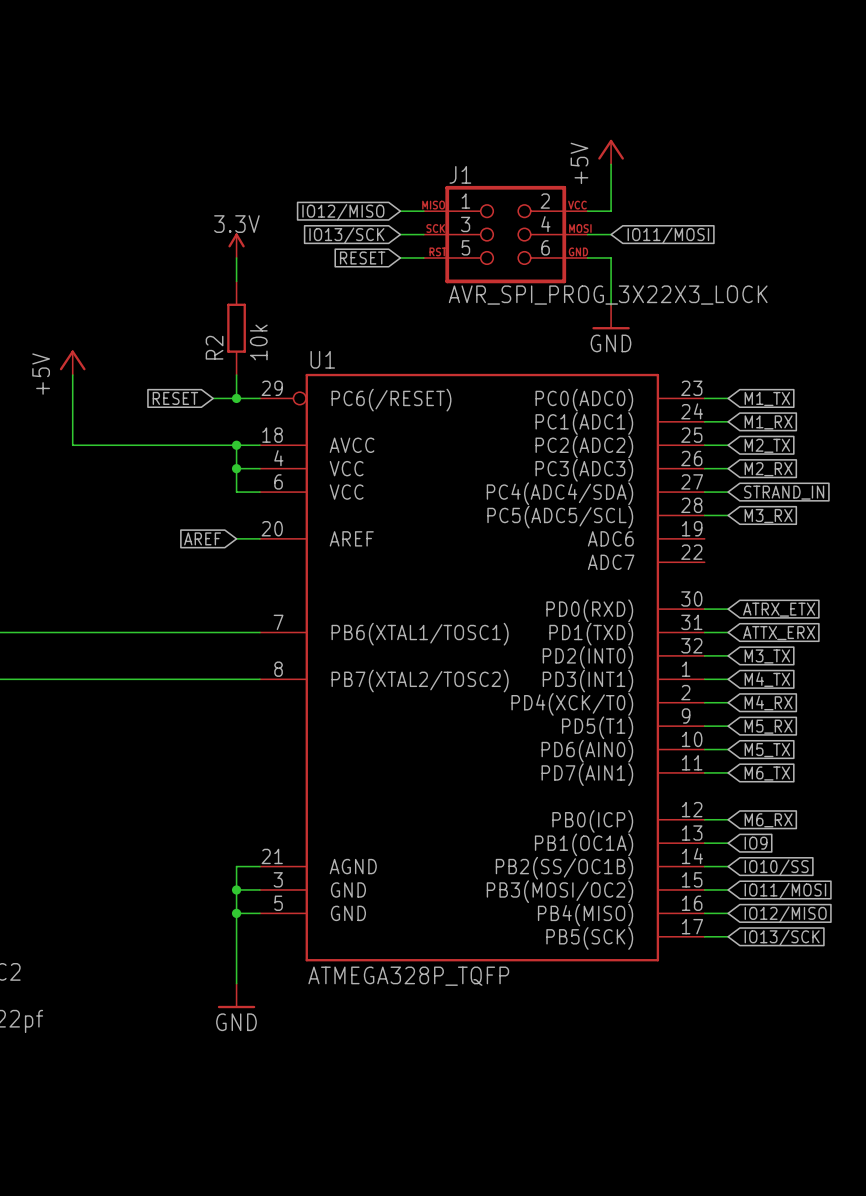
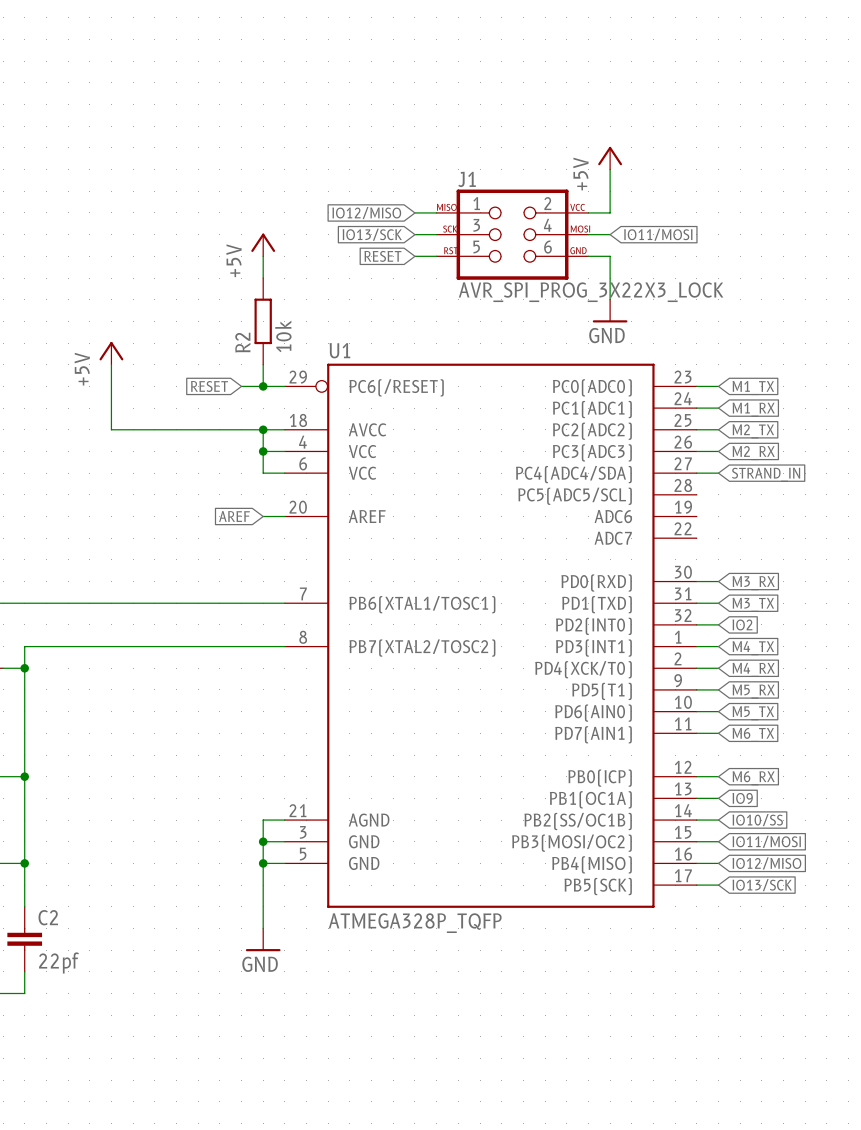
power symbol: 3.3V (236, 245) -> +5V (263, 244)
wire: (704, 515) (728, 515) -> none
global label: M3_RX (768, 516) -> none
global label: ATRX_ETX (779, 609) -> M3_RX (753, 583)
global label: ATTX_ERX (779, 633) -> M3_TX (753, 604)
global label: M3_TX (767, 656) -> IO2 (742, 624)

